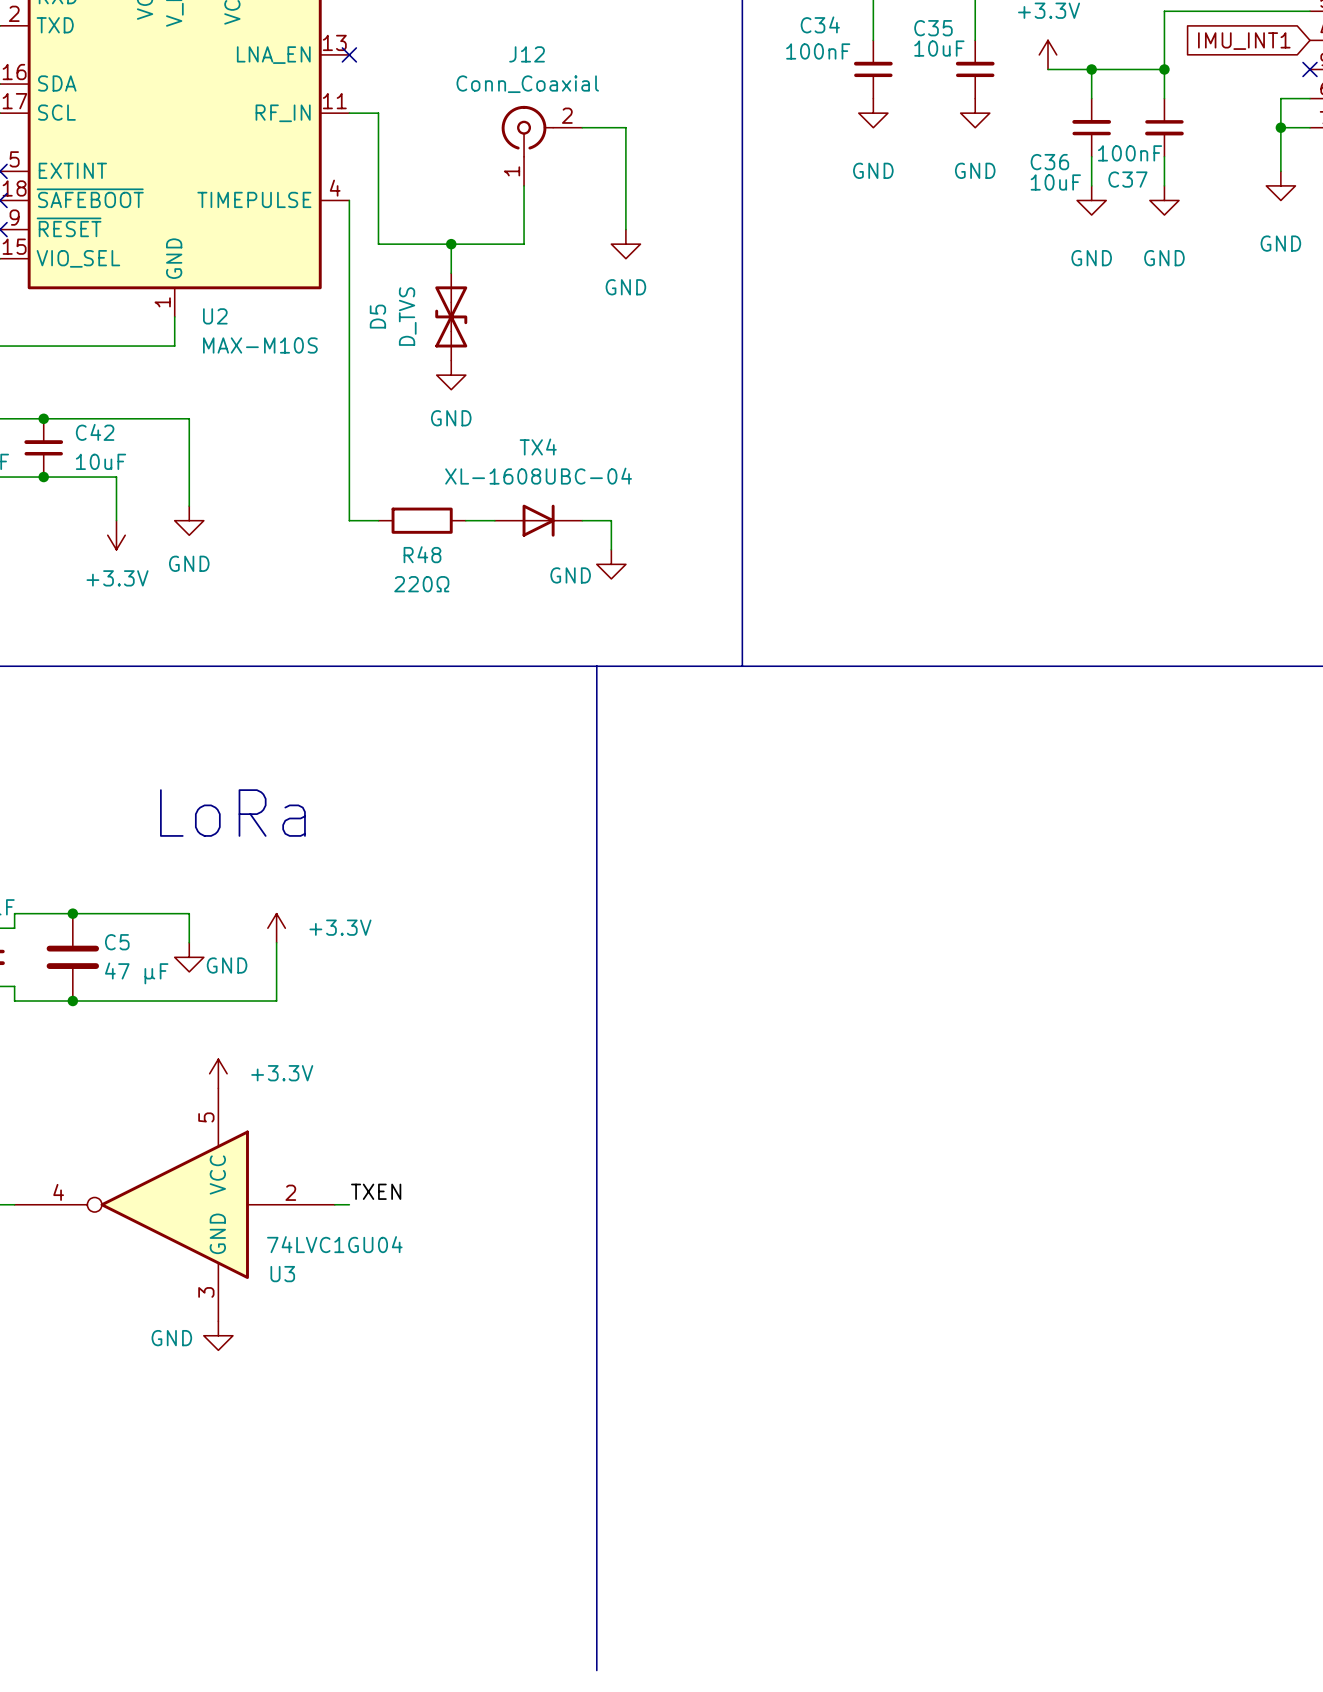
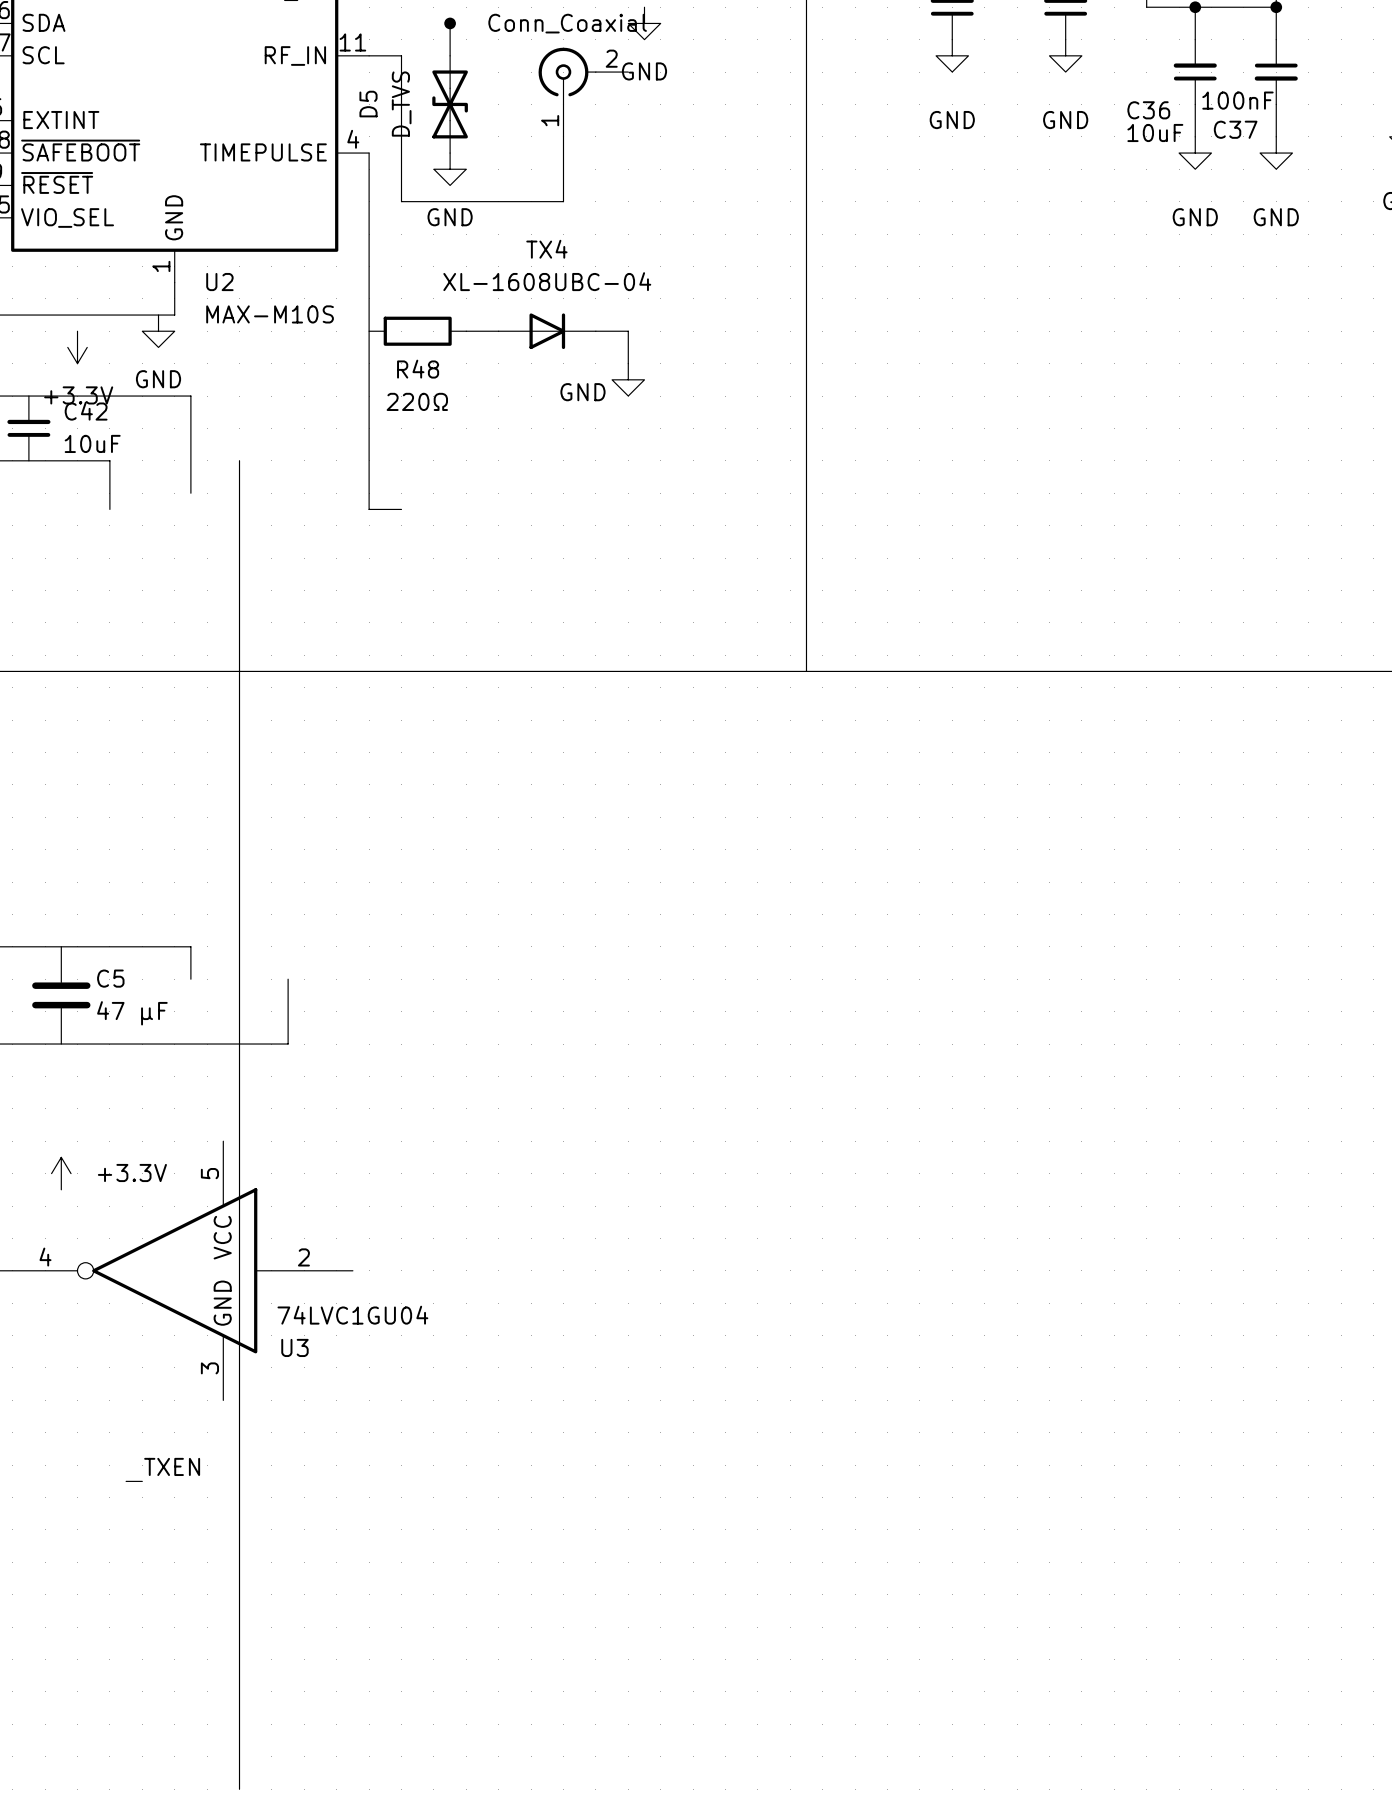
junction: none -> (450, 23)
power symbol: none -> GND (644, 23)
wire: (582, 127) (625, 127) (625, 229) -> none
power symbol: none -> GND (450, 169)
wire: (451, 244) (451, 273) -> (450, 23) (450, 55)
junction: (451, 244) -> none
power symbol: GND (625, 244) -> none
D5 position: (451, 316) -> (450, 104)
power symbol: none -> GND (158, 331)
power symbol: GND (451, 375) -> none
power symbol: none -> GND (628, 379)
junction: (43, 418) -> none
junction: (43, 477) -> none
line: none -> (239, 460) (239, 1789)
power symbol: GND (189, 520) -> none
R48 position: (422, 520) -> (417, 331)
wire: (465, 520) (494, 520) -> (466, 331) (498, 331)
TX4 position: (538, 520) -> (547, 331)
wire: (582, 520) (611, 520) (611, 549) -> (595, 331) (628, 331) (628, 363)
power symbol position: +3.3V (116, 535) -> +3.3V (77, 347)
power symbol: GND (611, 564) -> none
line: (596, 666) (596, 1670) -> none
text: LoRa (232, 813) -> none
junction: (72, 913) -> none
power symbol: +3.3V (276, 928) -> none
power symbol: GND (189, 957) -> none
junction: (72, 1001) -> none
power symbol: +3.3V (218, 1073) -> none
power symbol: none -> +3.3V (61, 1173)
label position: TXEN (376, 1191) -> TXEN (172, 1466)
wire: (334, 1204) (349, 1204) -> (126, 1481) (142, 1481)
power symbol: GND (218, 1335) -> none

